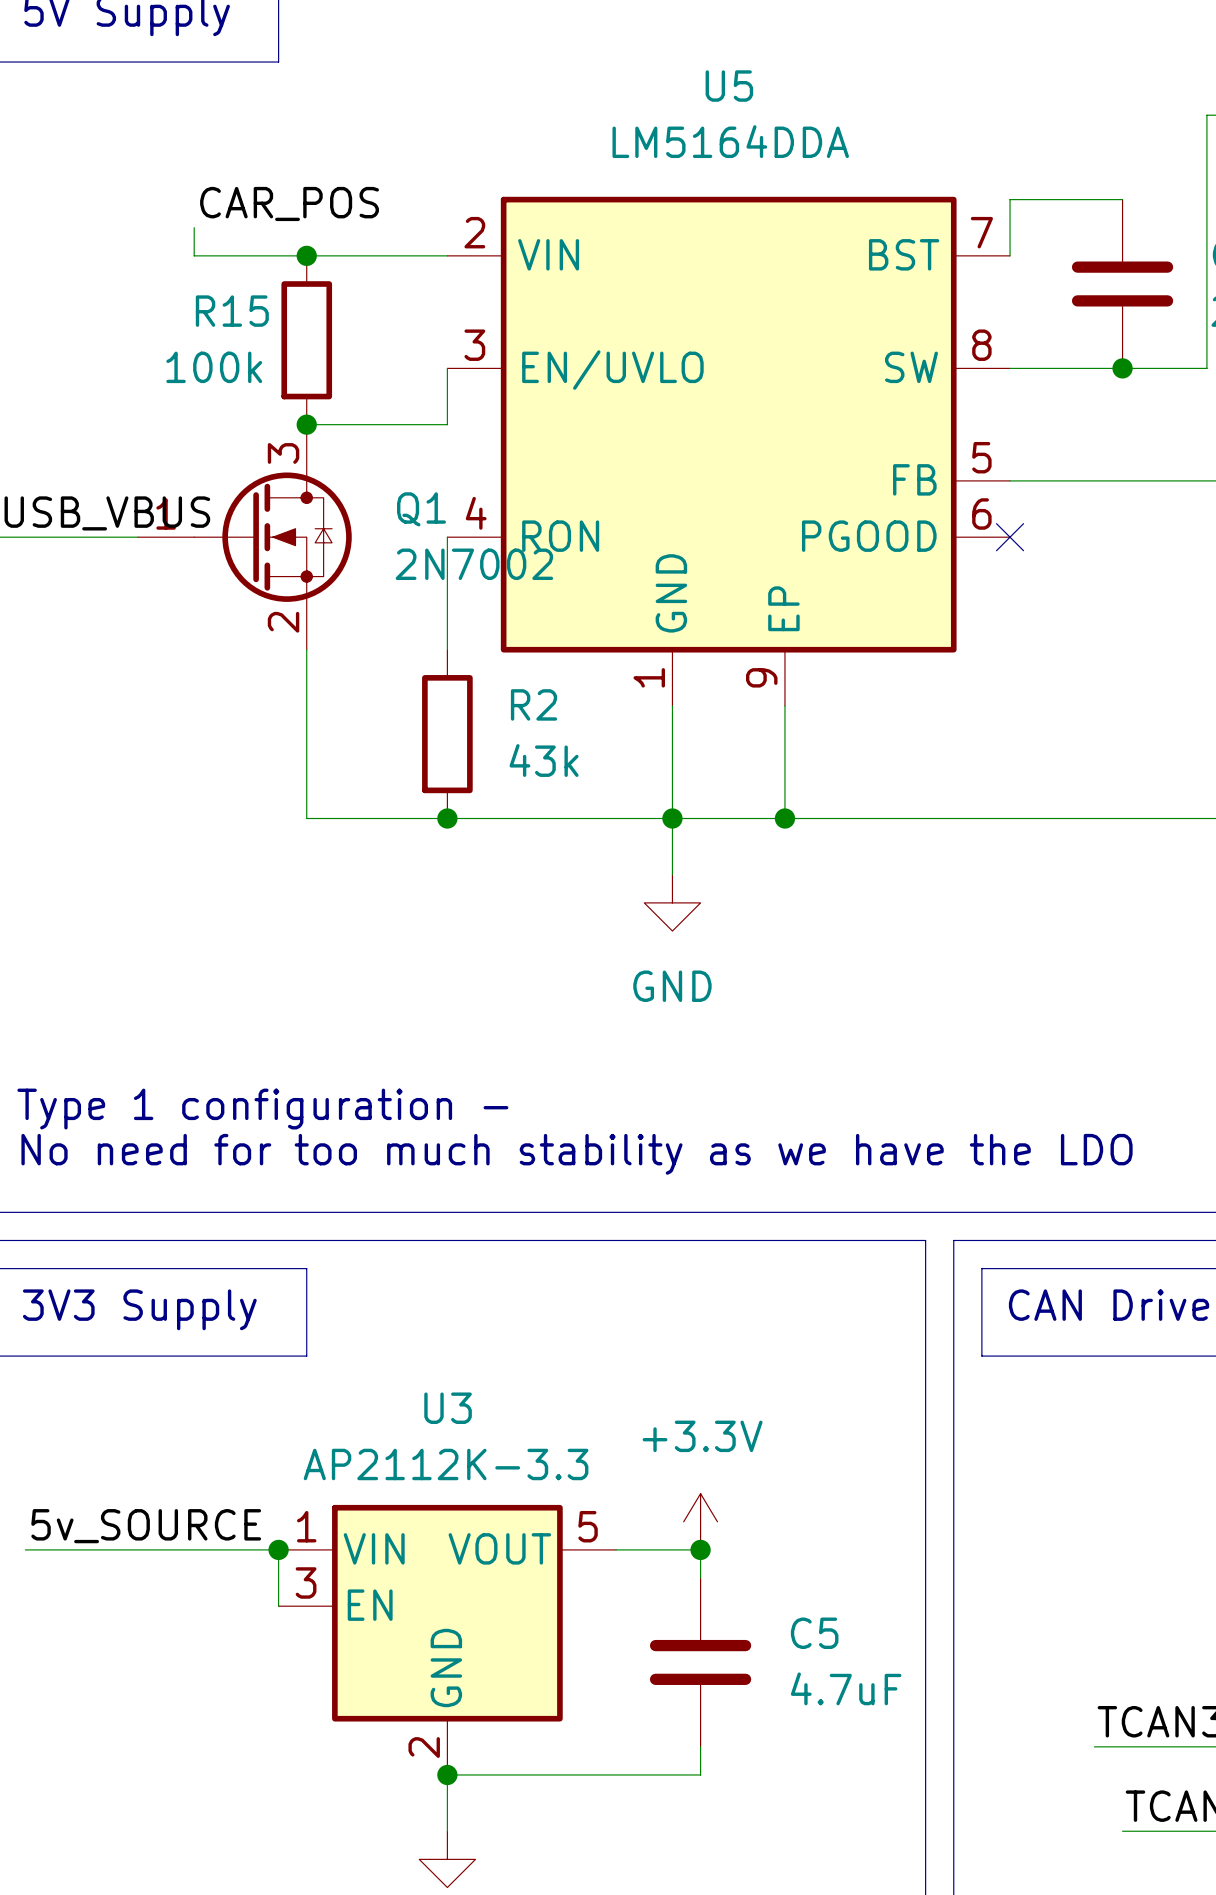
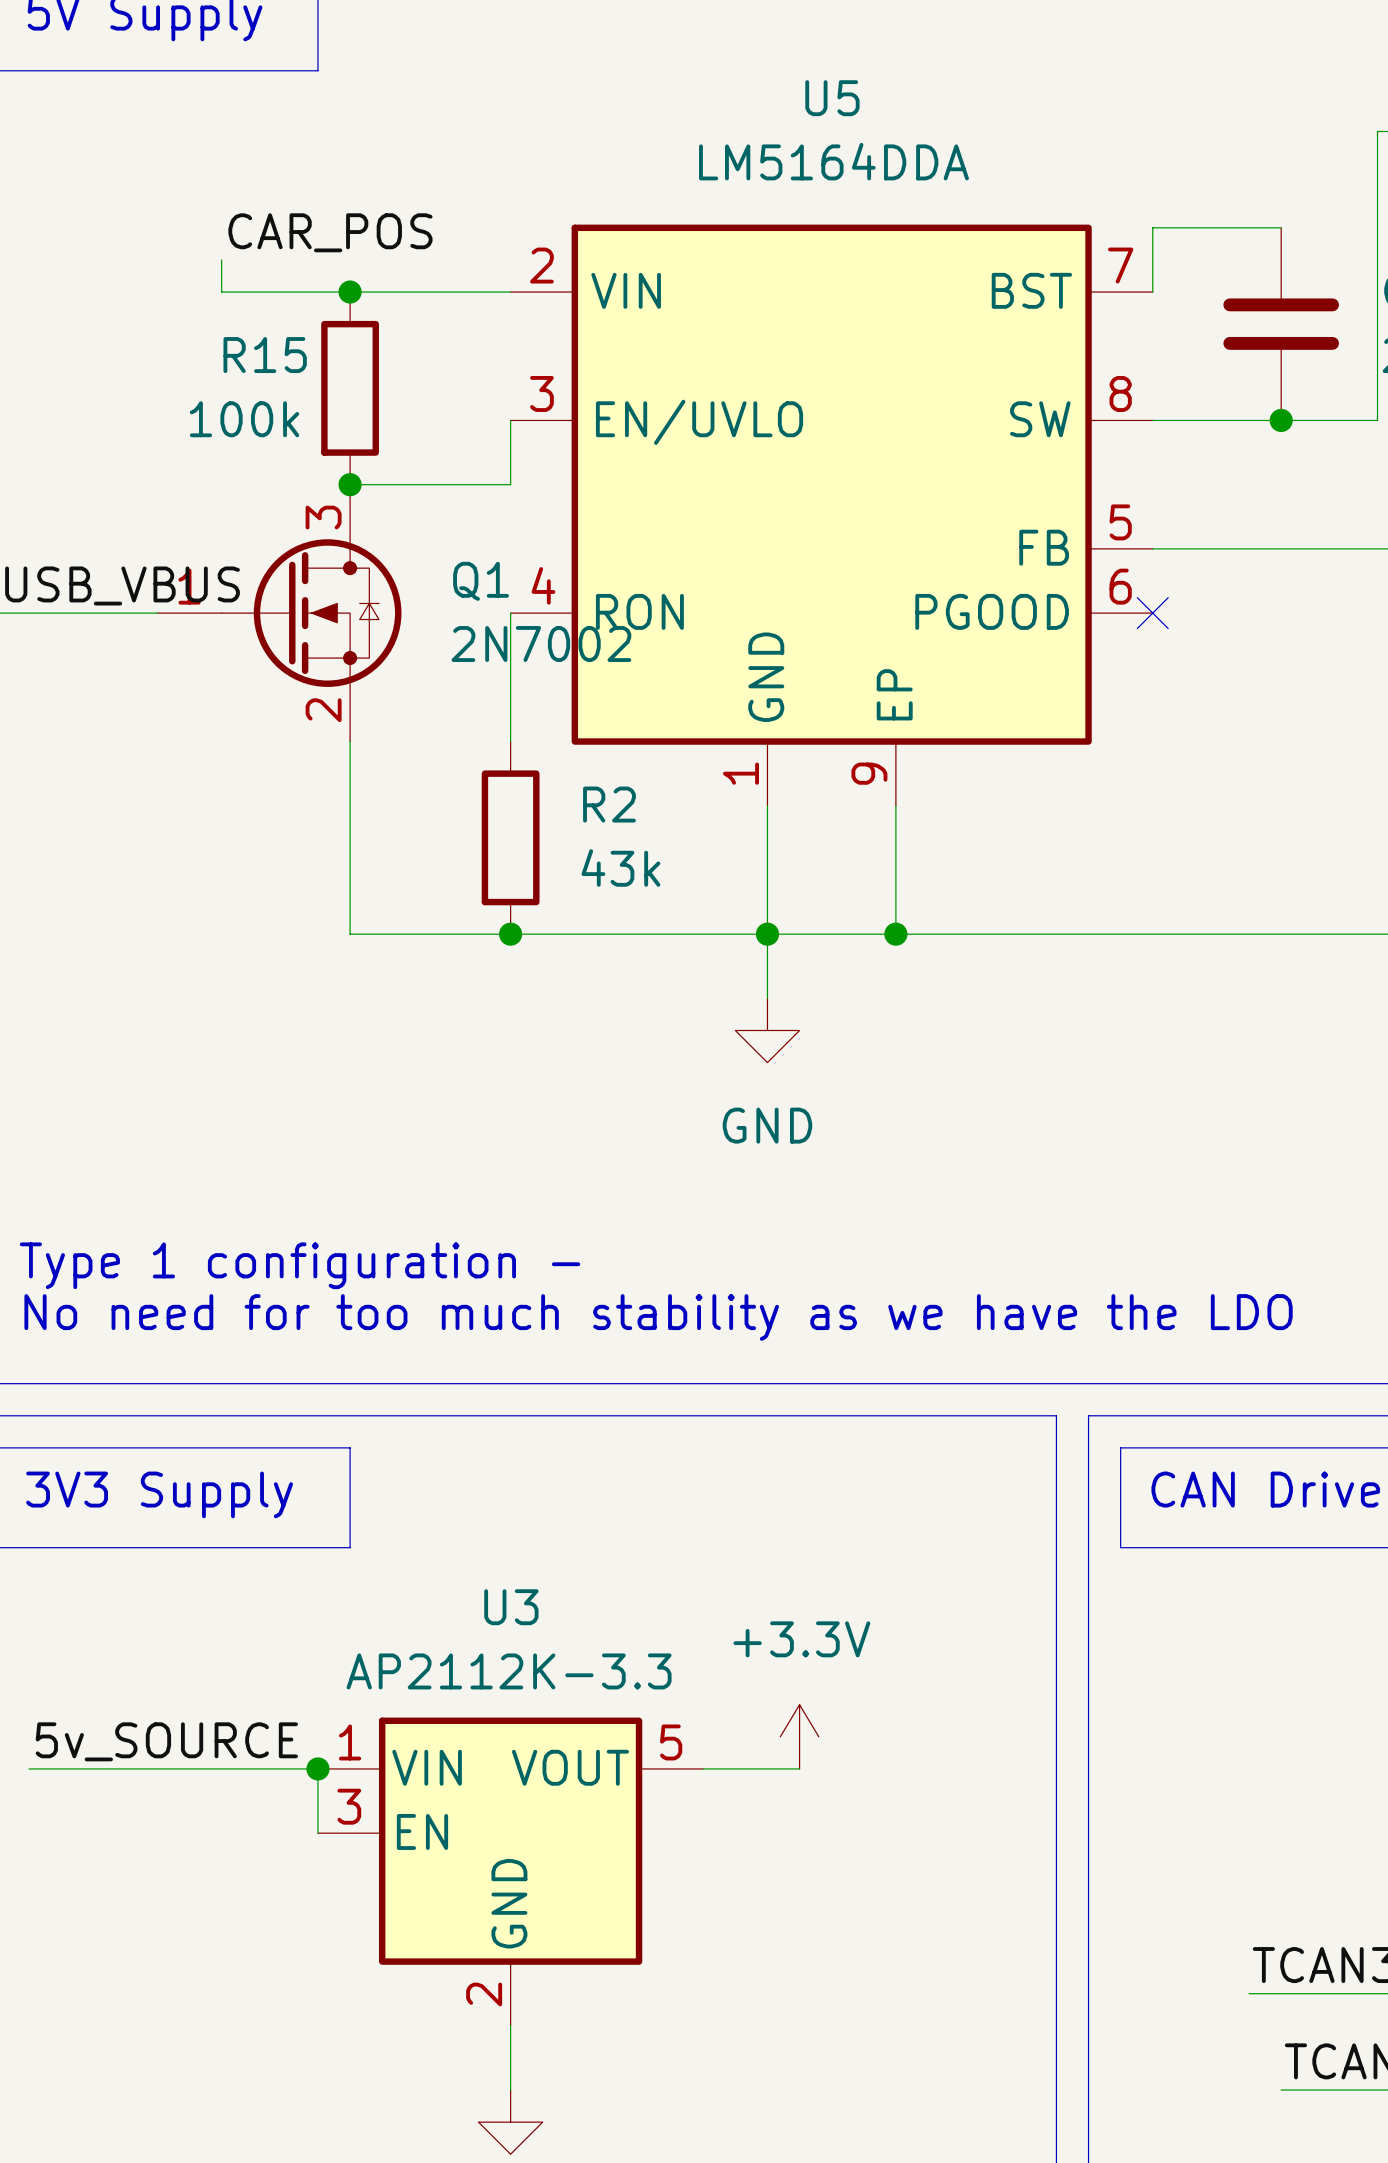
wire: (700, 1549) (700, 1578) -> none
junction: (700, 1549) -> none
C5: 4.7uF (700, 1662) -> none
wire: (700, 1746) (700, 1774) (447, 1774) -> none
junction: (447, 1774) -> none

